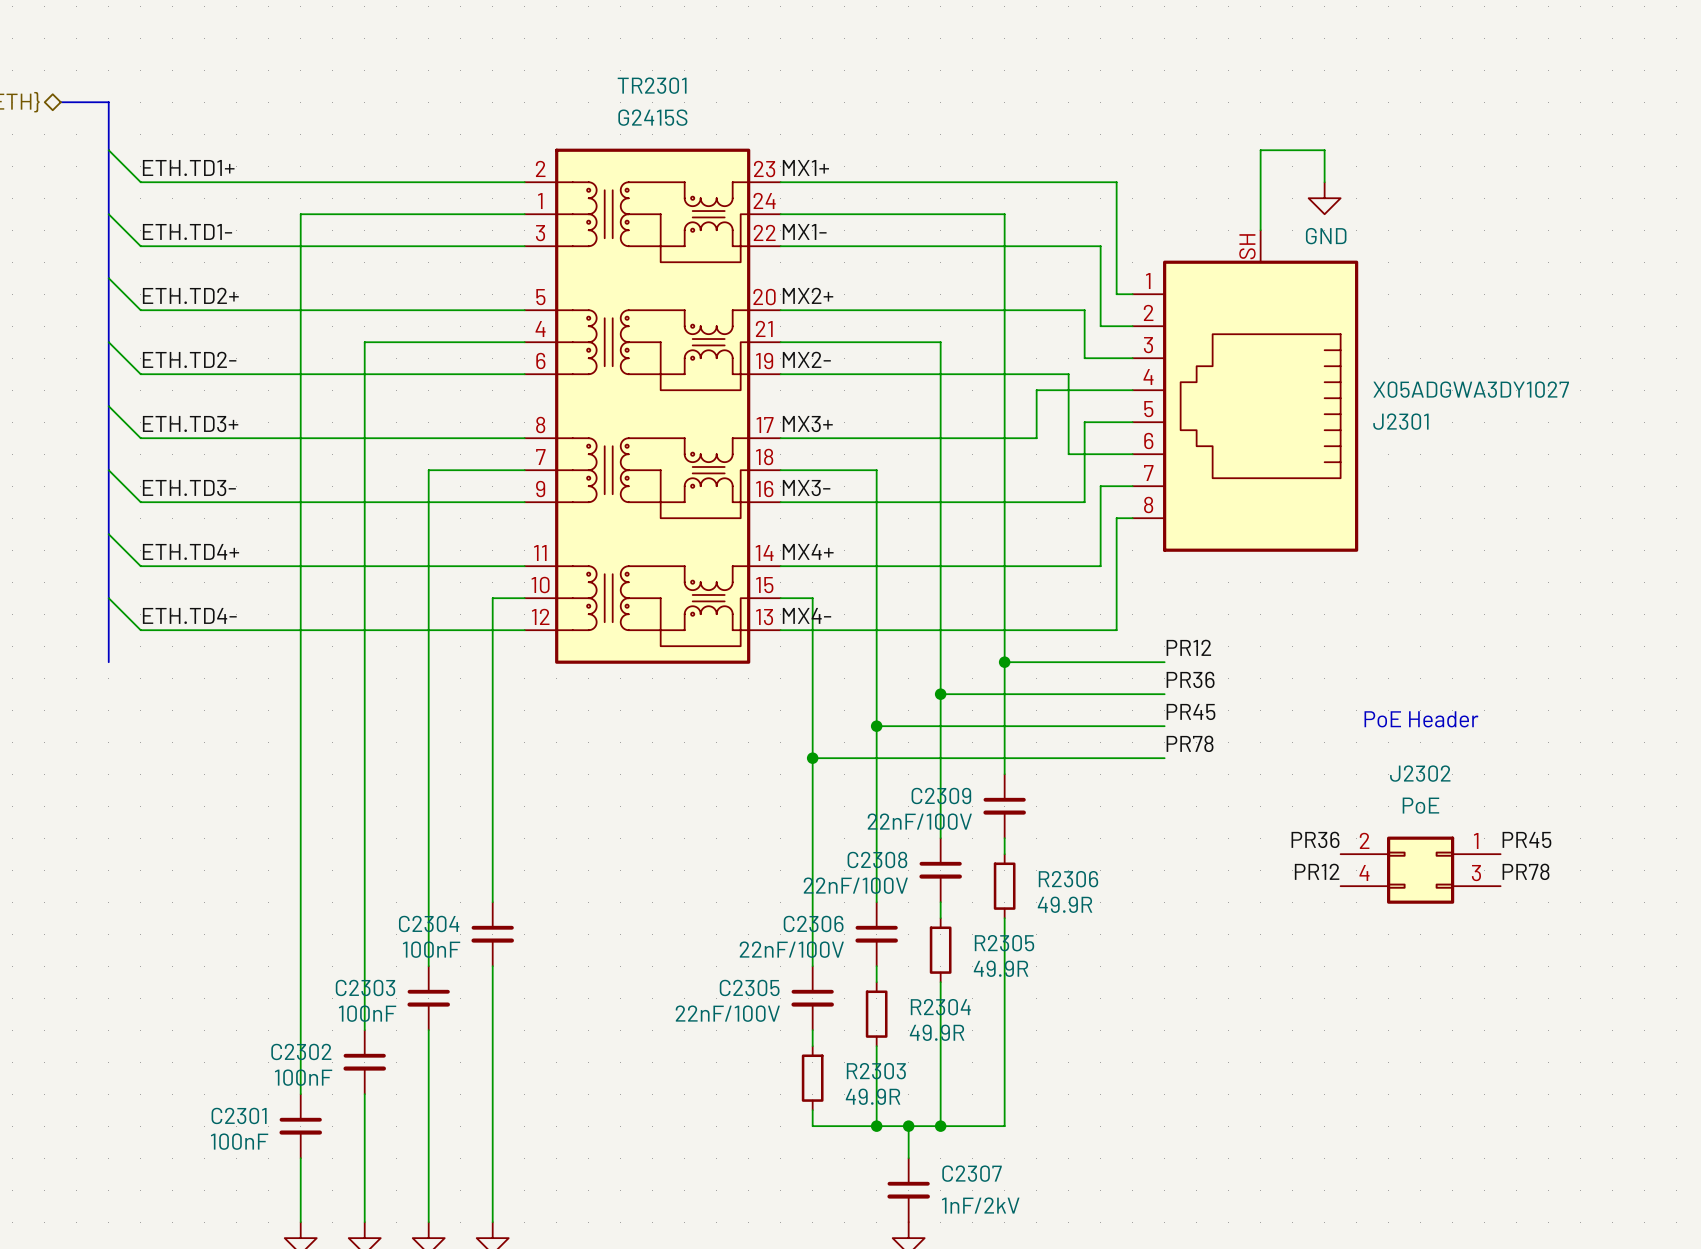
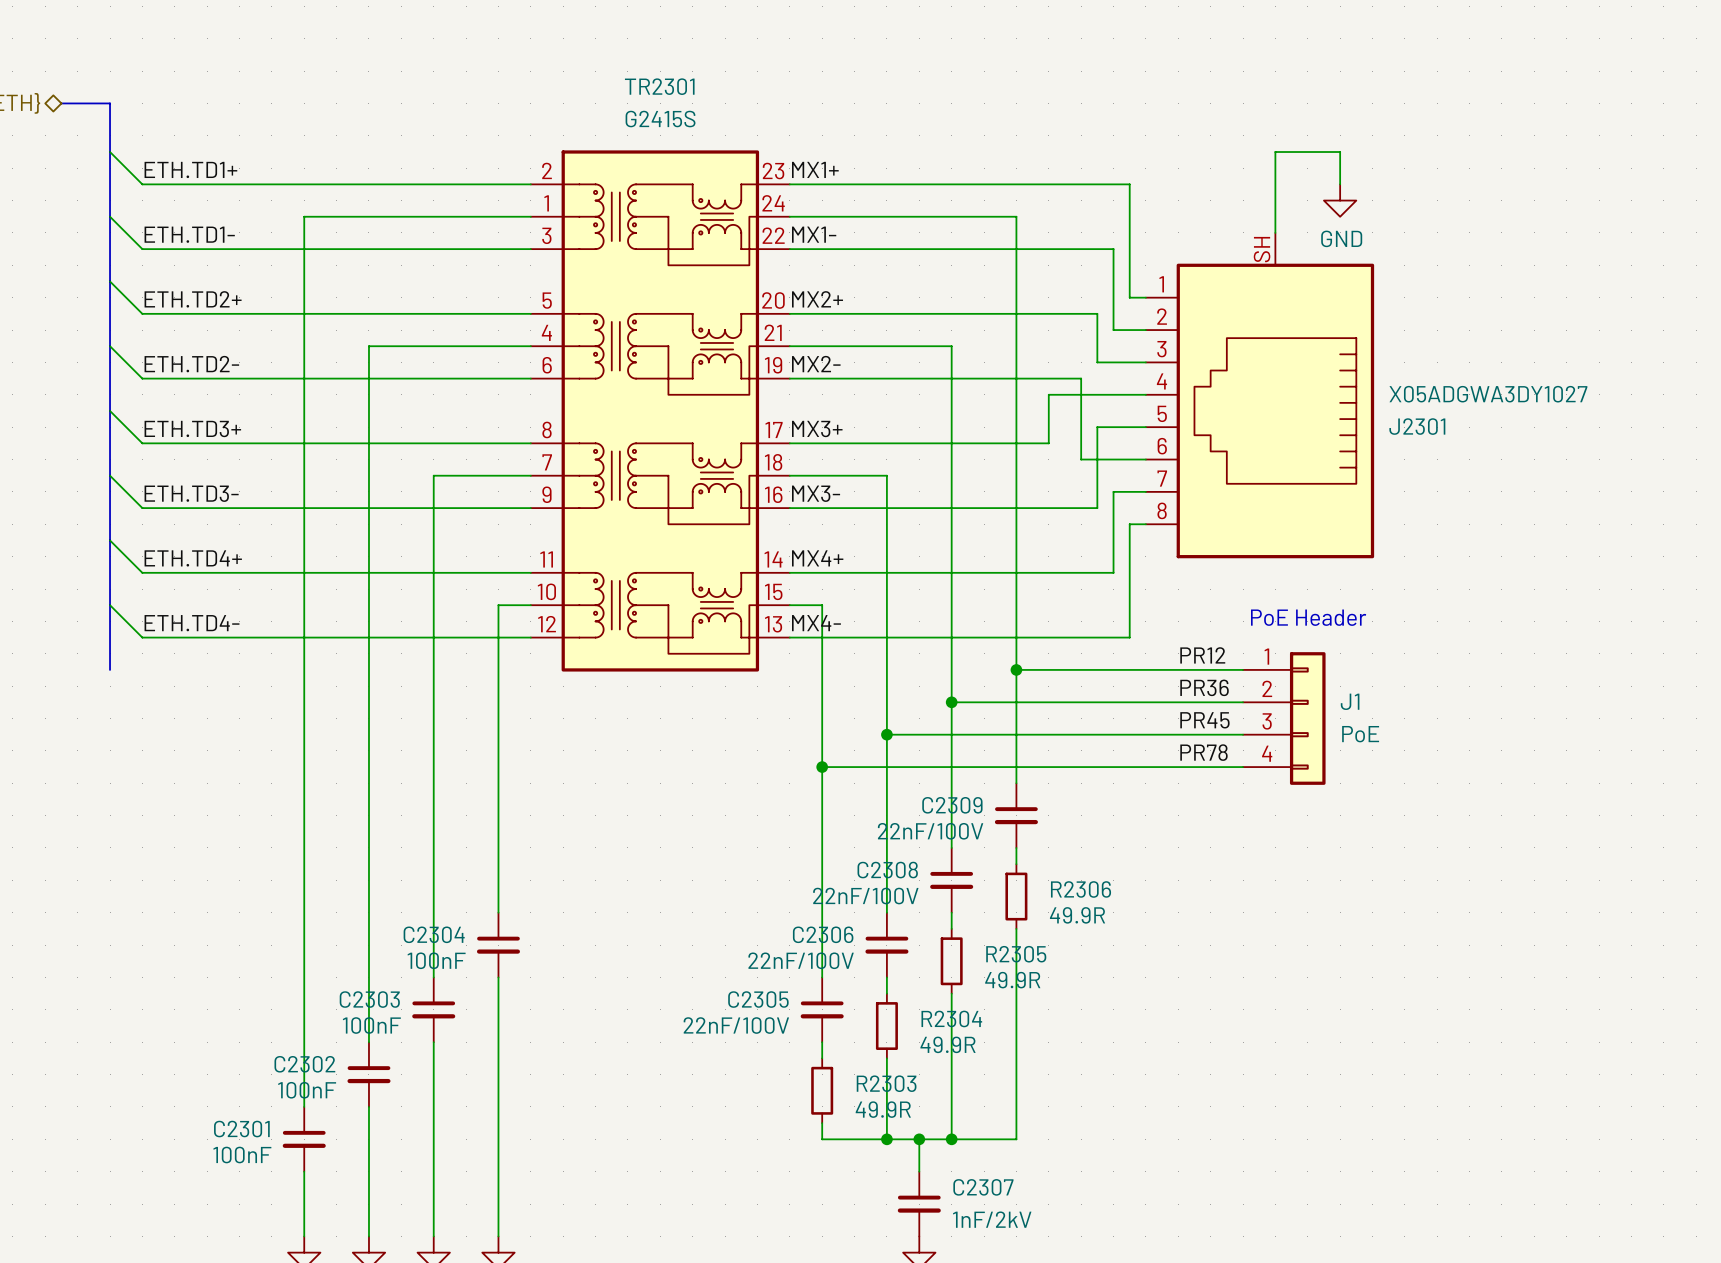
wire: none -> (1178, 669) (1243, 669)
wire: none -> (1178, 702) (1243, 702)
J1: none -> PoE (1284, 718)
text position: PoE Header (1421, 719) -> PoE Header (1308, 617)
wire: none -> (1178, 734) (1243, 734)
wire: none -> (1178, 767) (1243, 767)
label: PR36 (1315, 839) -> none
label: PR45 (1526, 839) -> none
J2302: PoE (1420, 870) -> none
label: PR12 (1317, 871) -> none
label: PR78 (1526, 871) -> none

